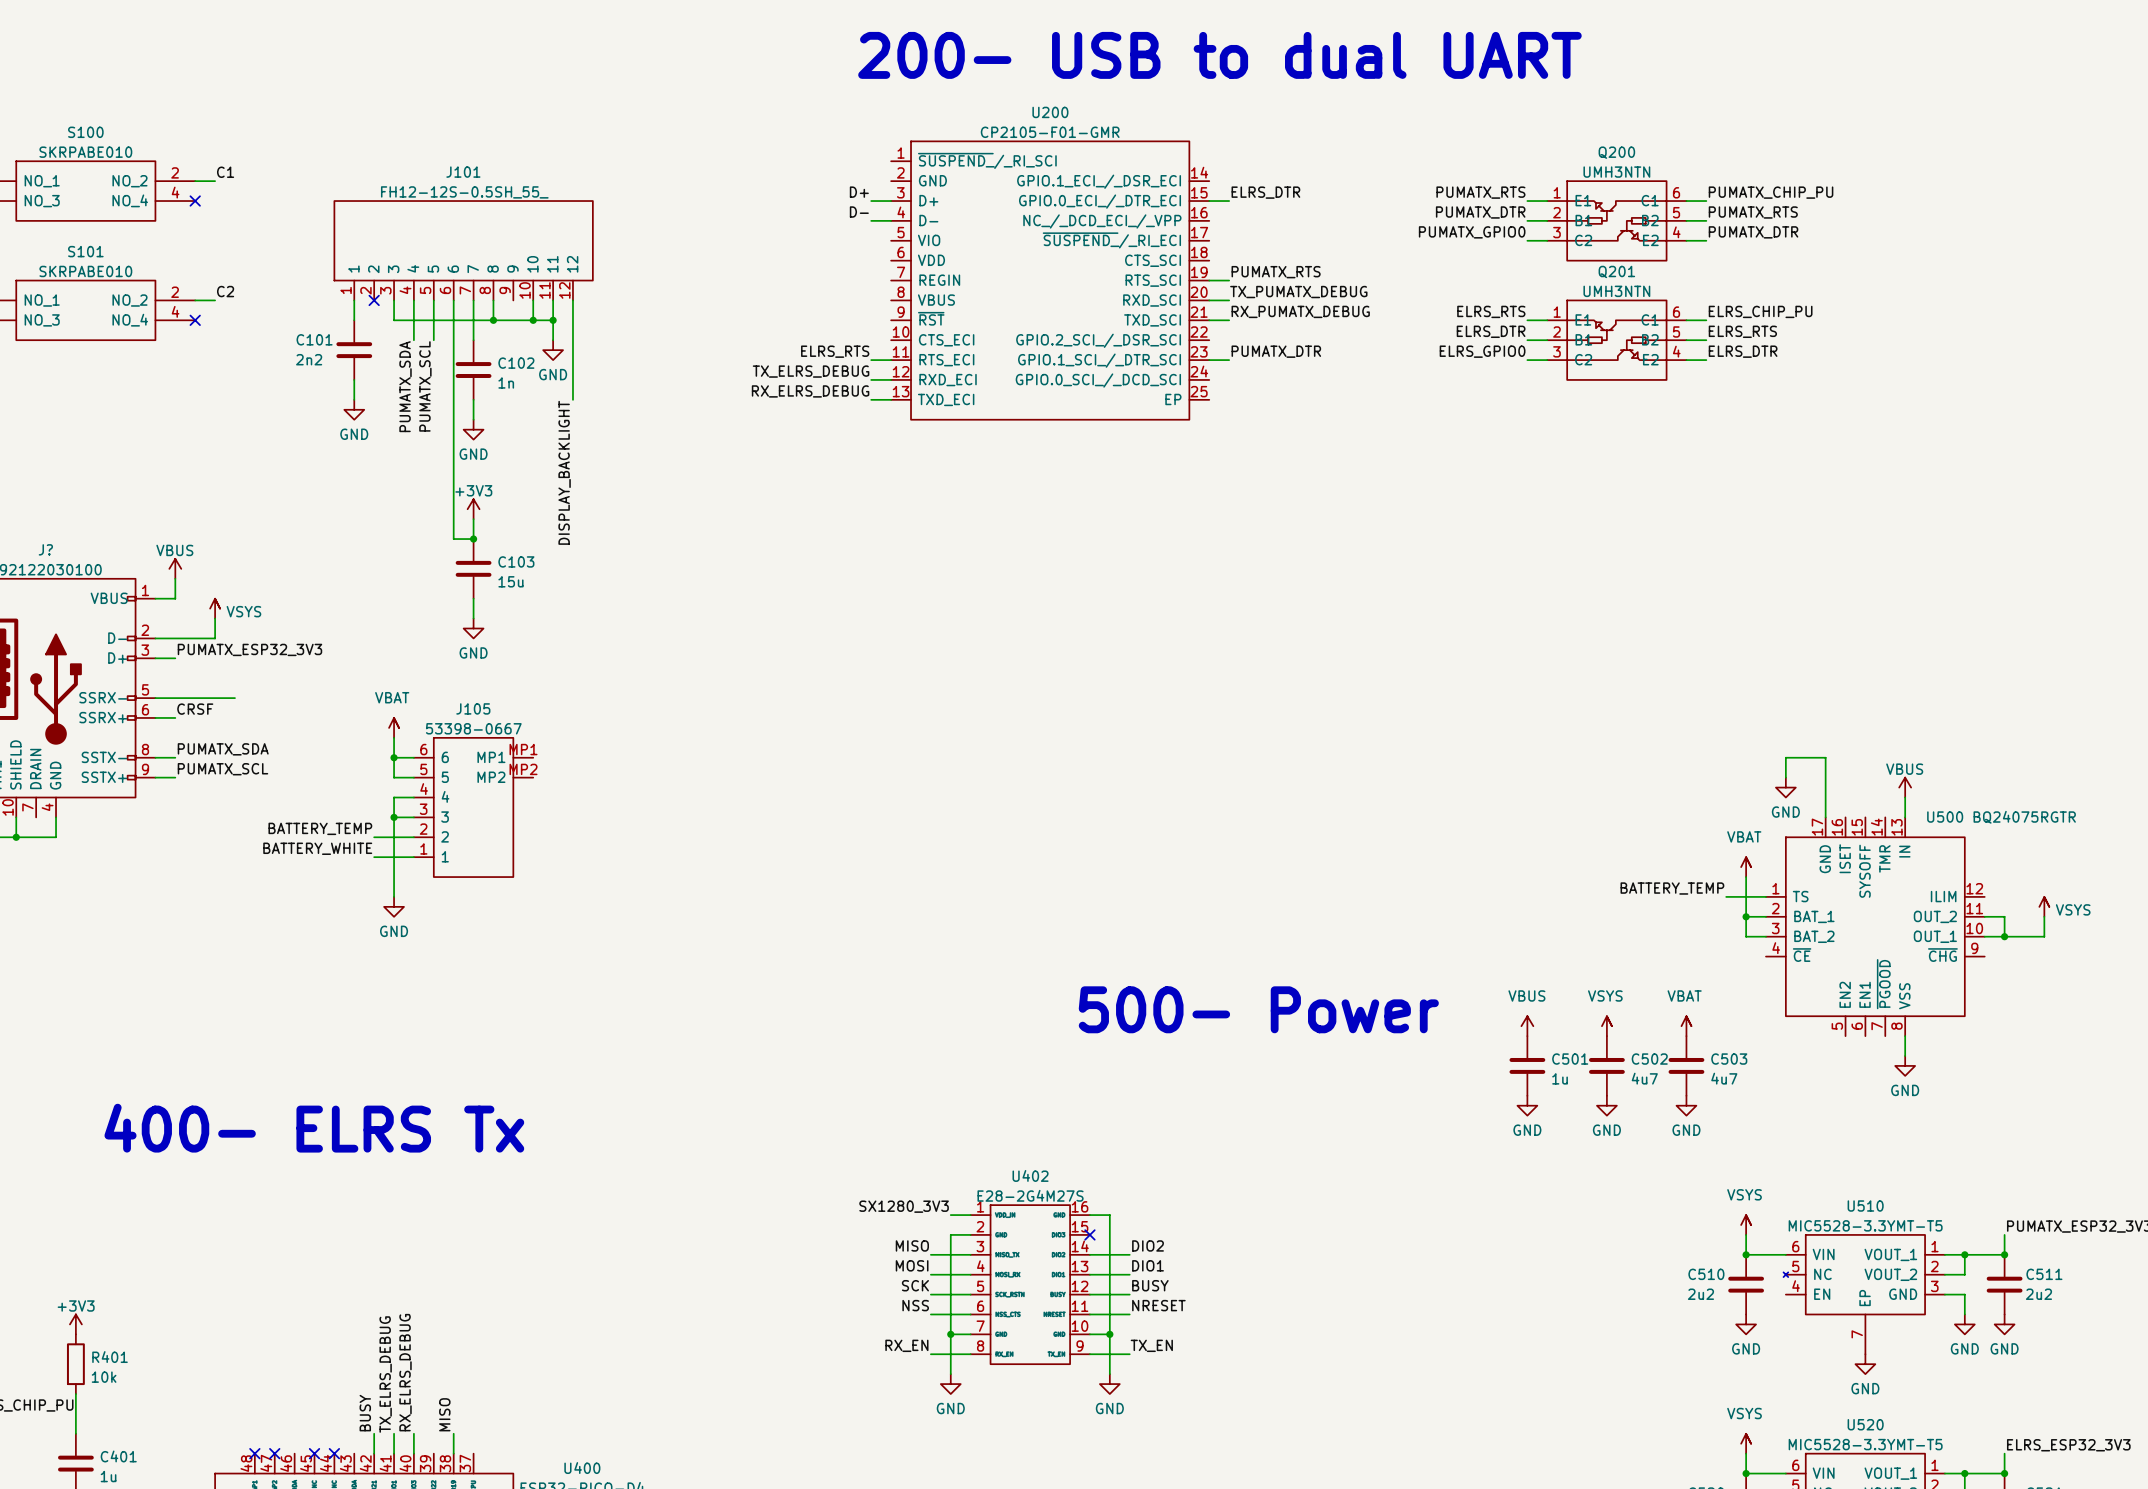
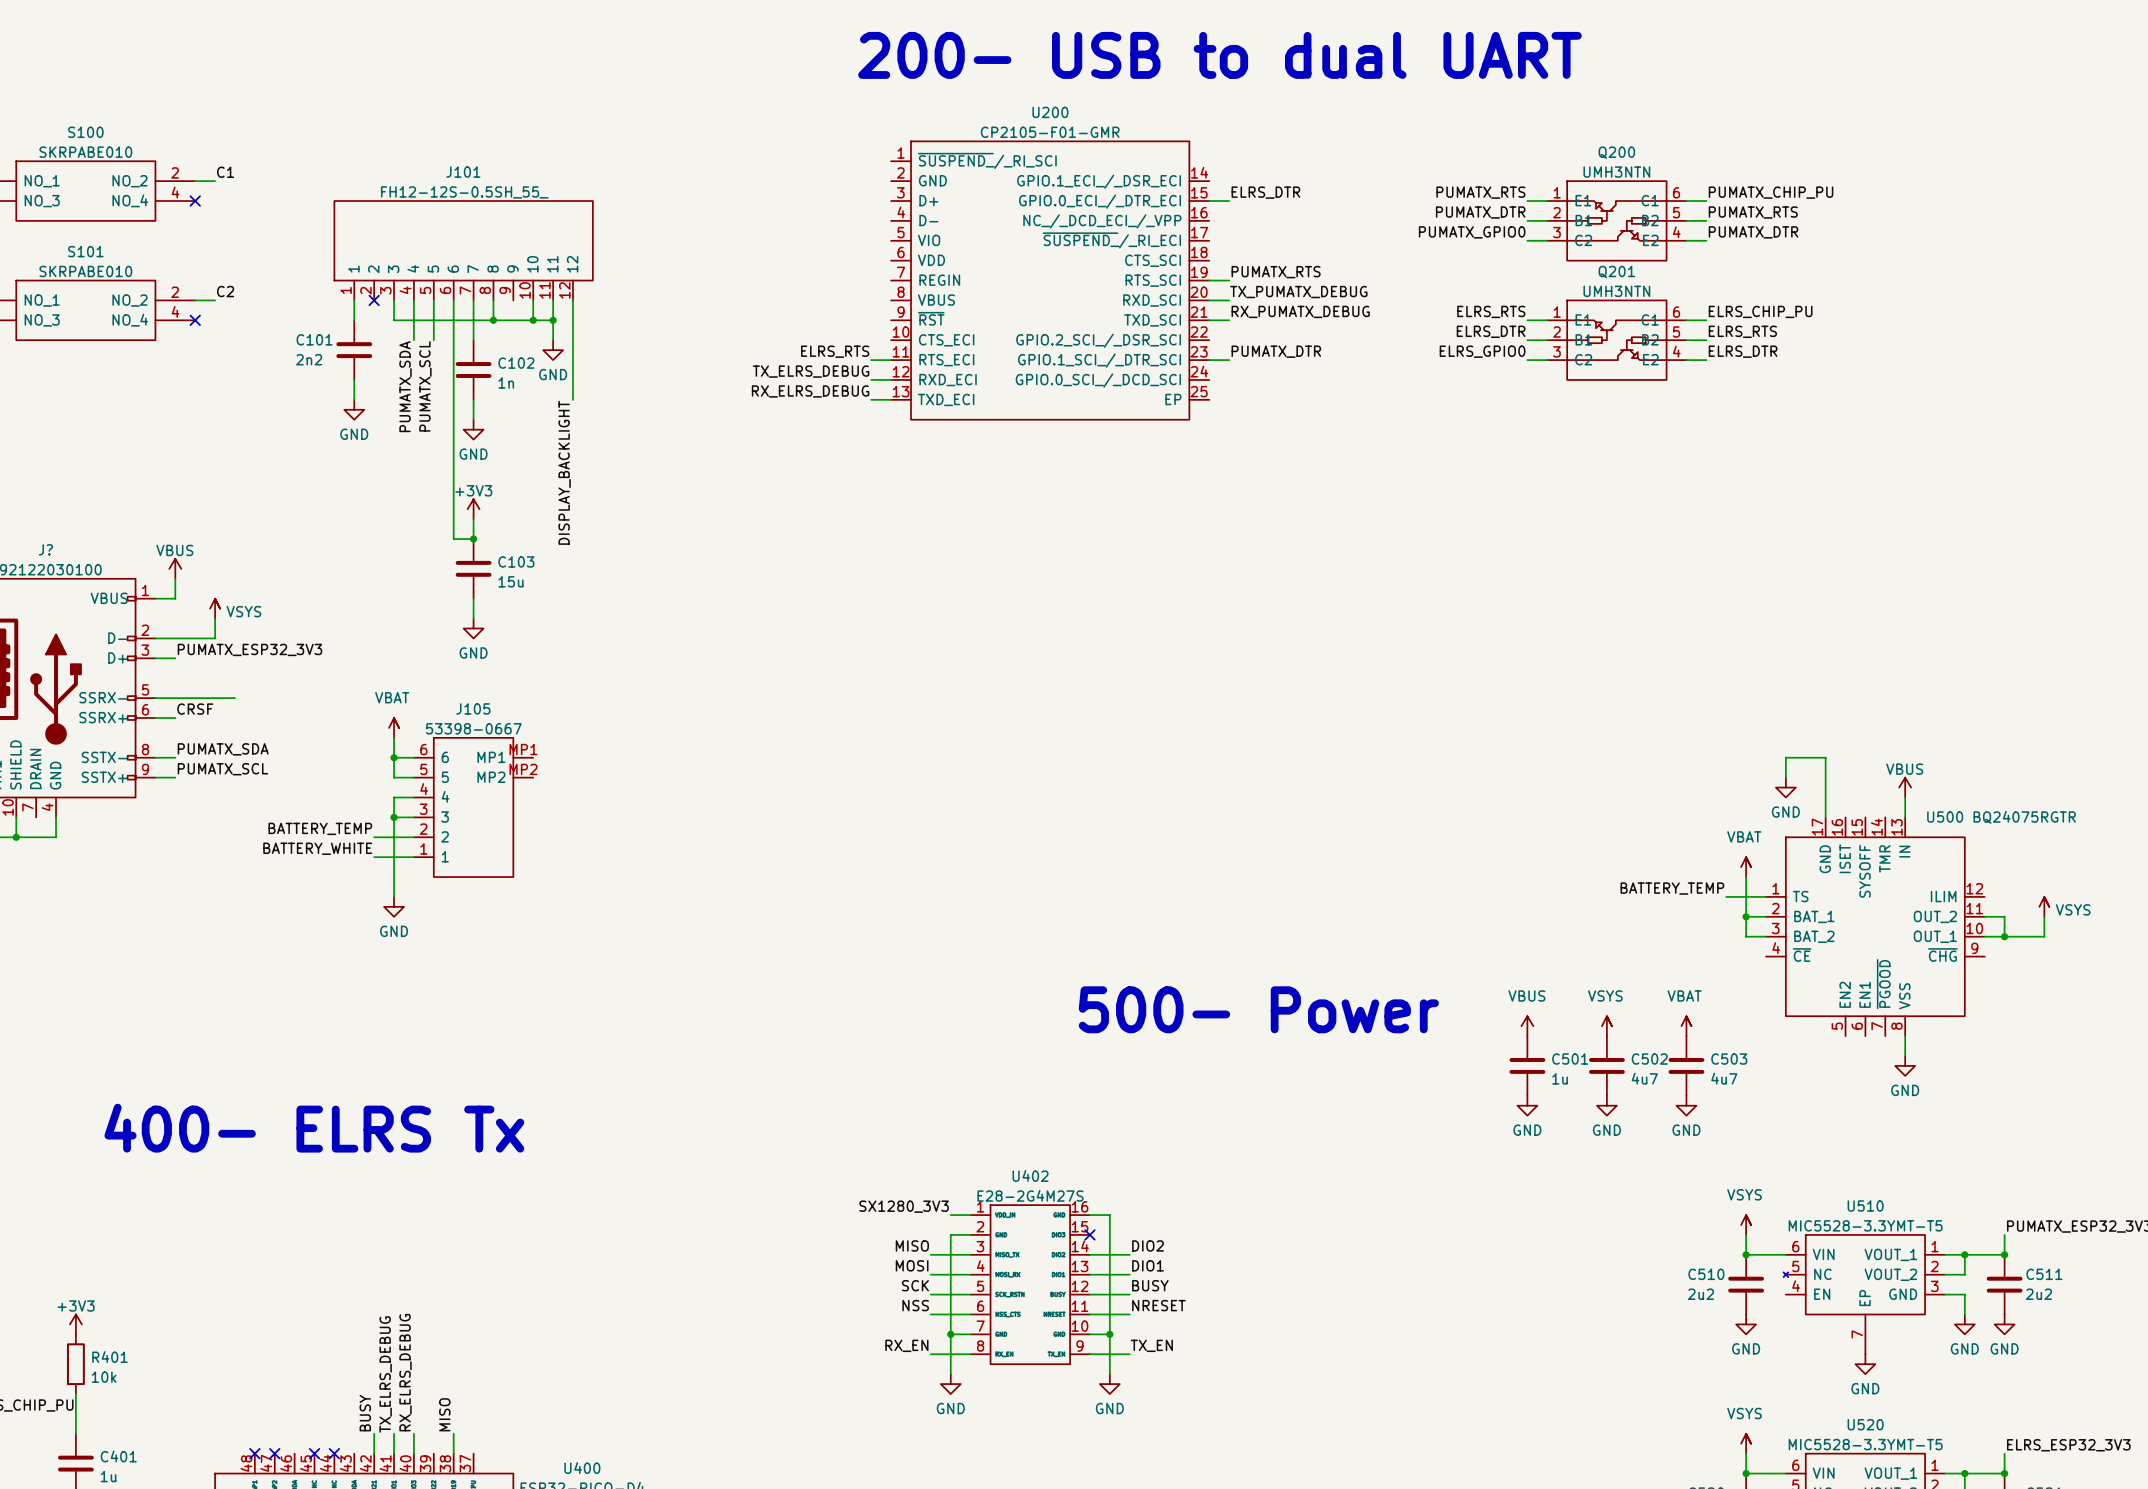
label: D+ (859, 192) -> none
wire: (871, 201) (891, 201) -> none
label: D- (859, 212) -> none
wire: (871, 220) (891, 220) -> none

